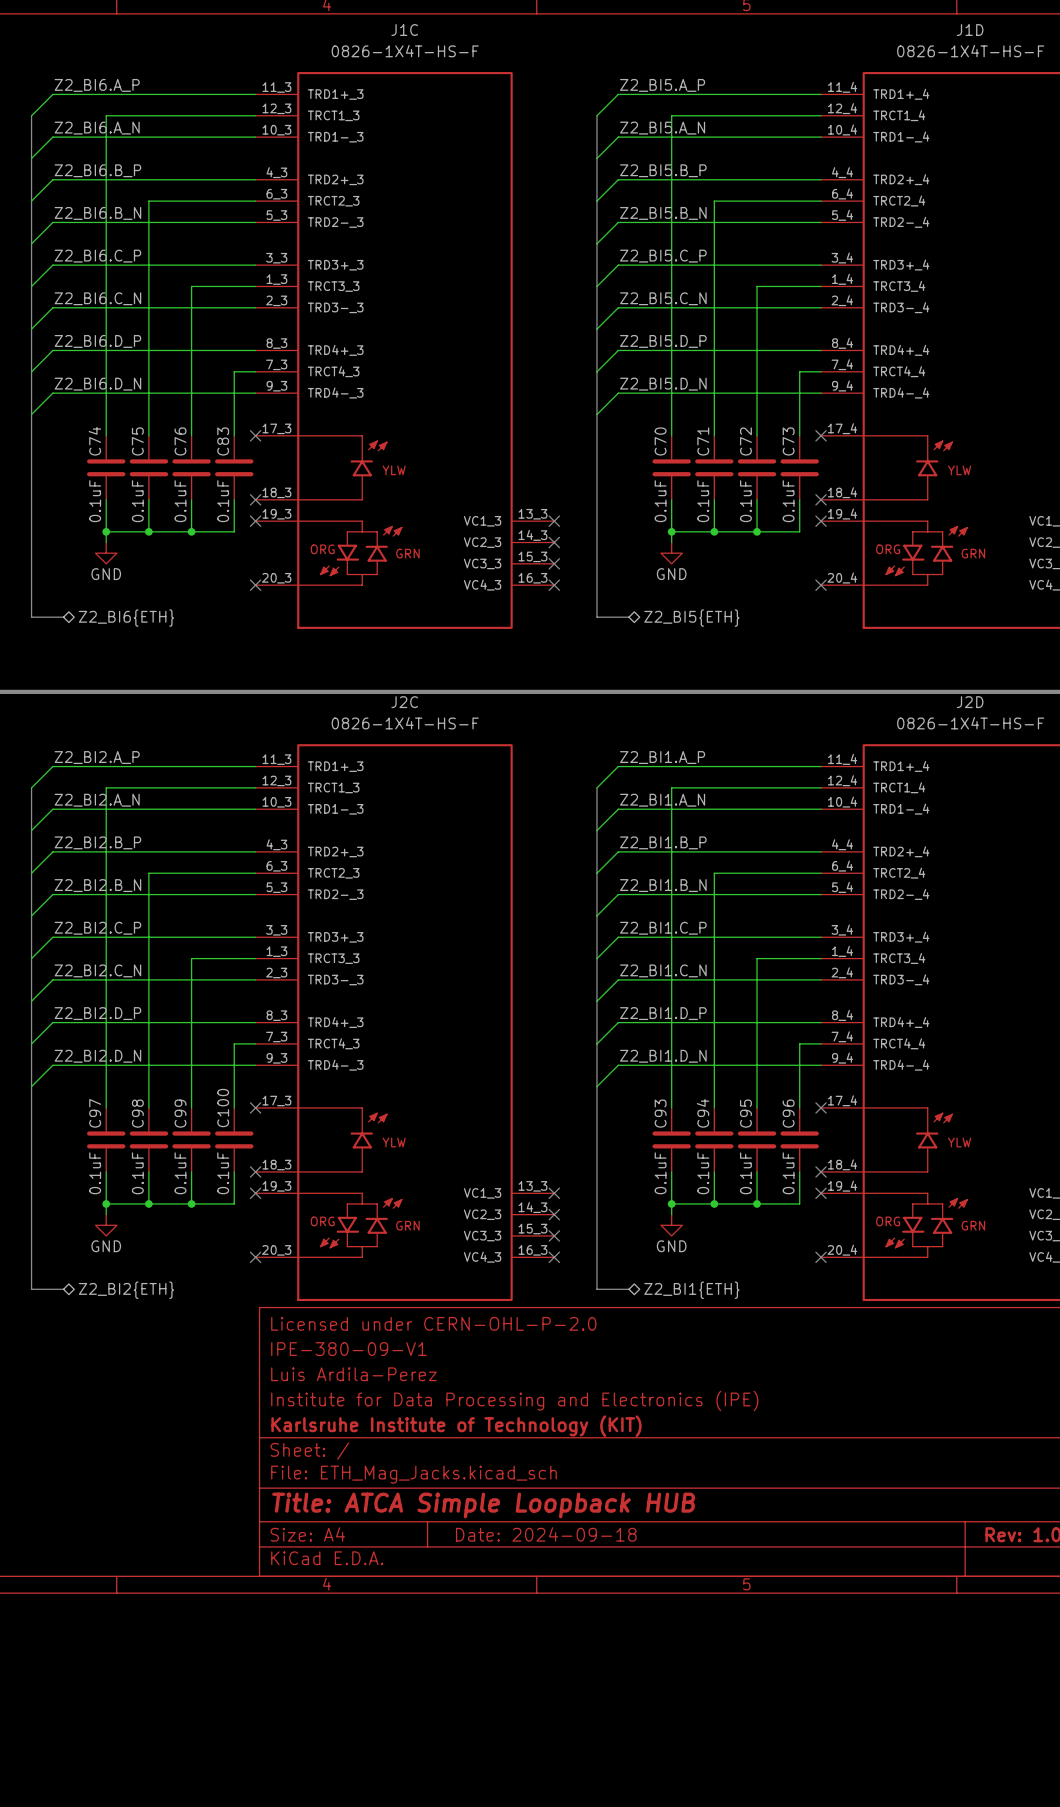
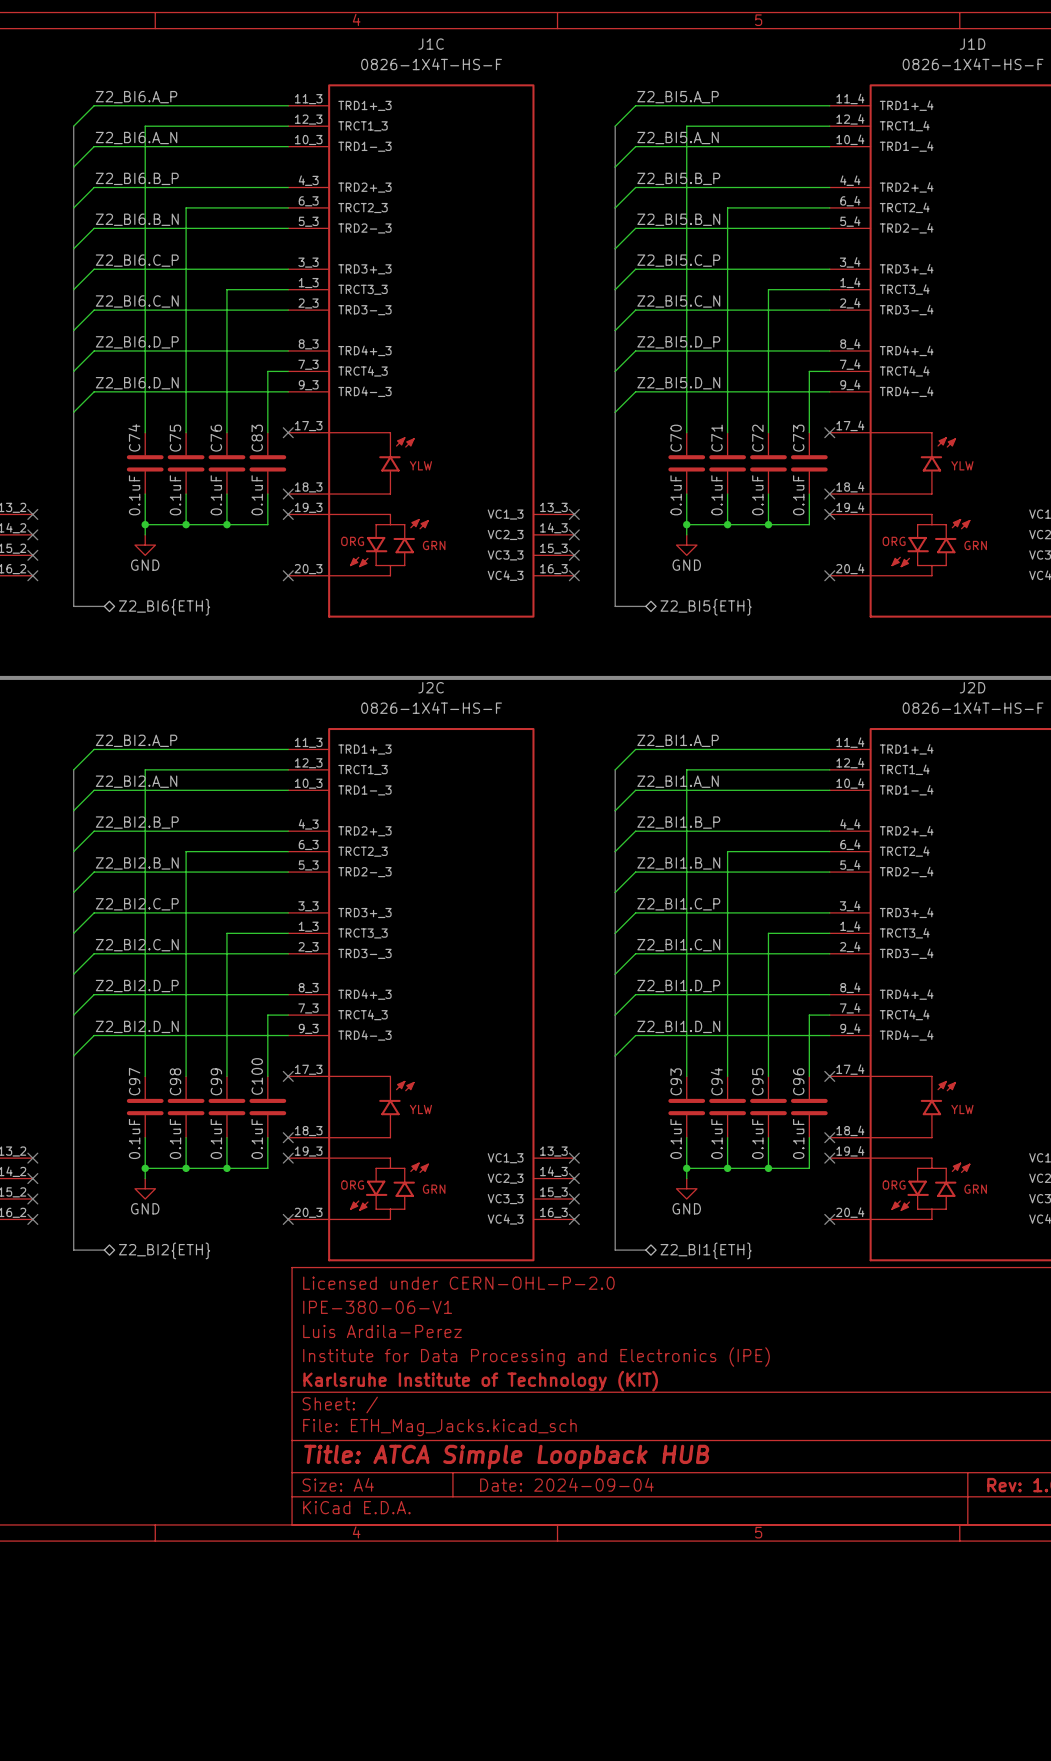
title block: IPE-380-09-V1 (348, 1349) -> IPE-380-06-V1 (377, 1307)
title block: Date: 2024-09-18 (546, 1534) -> Date: 2024-09-04 (566, 1484)

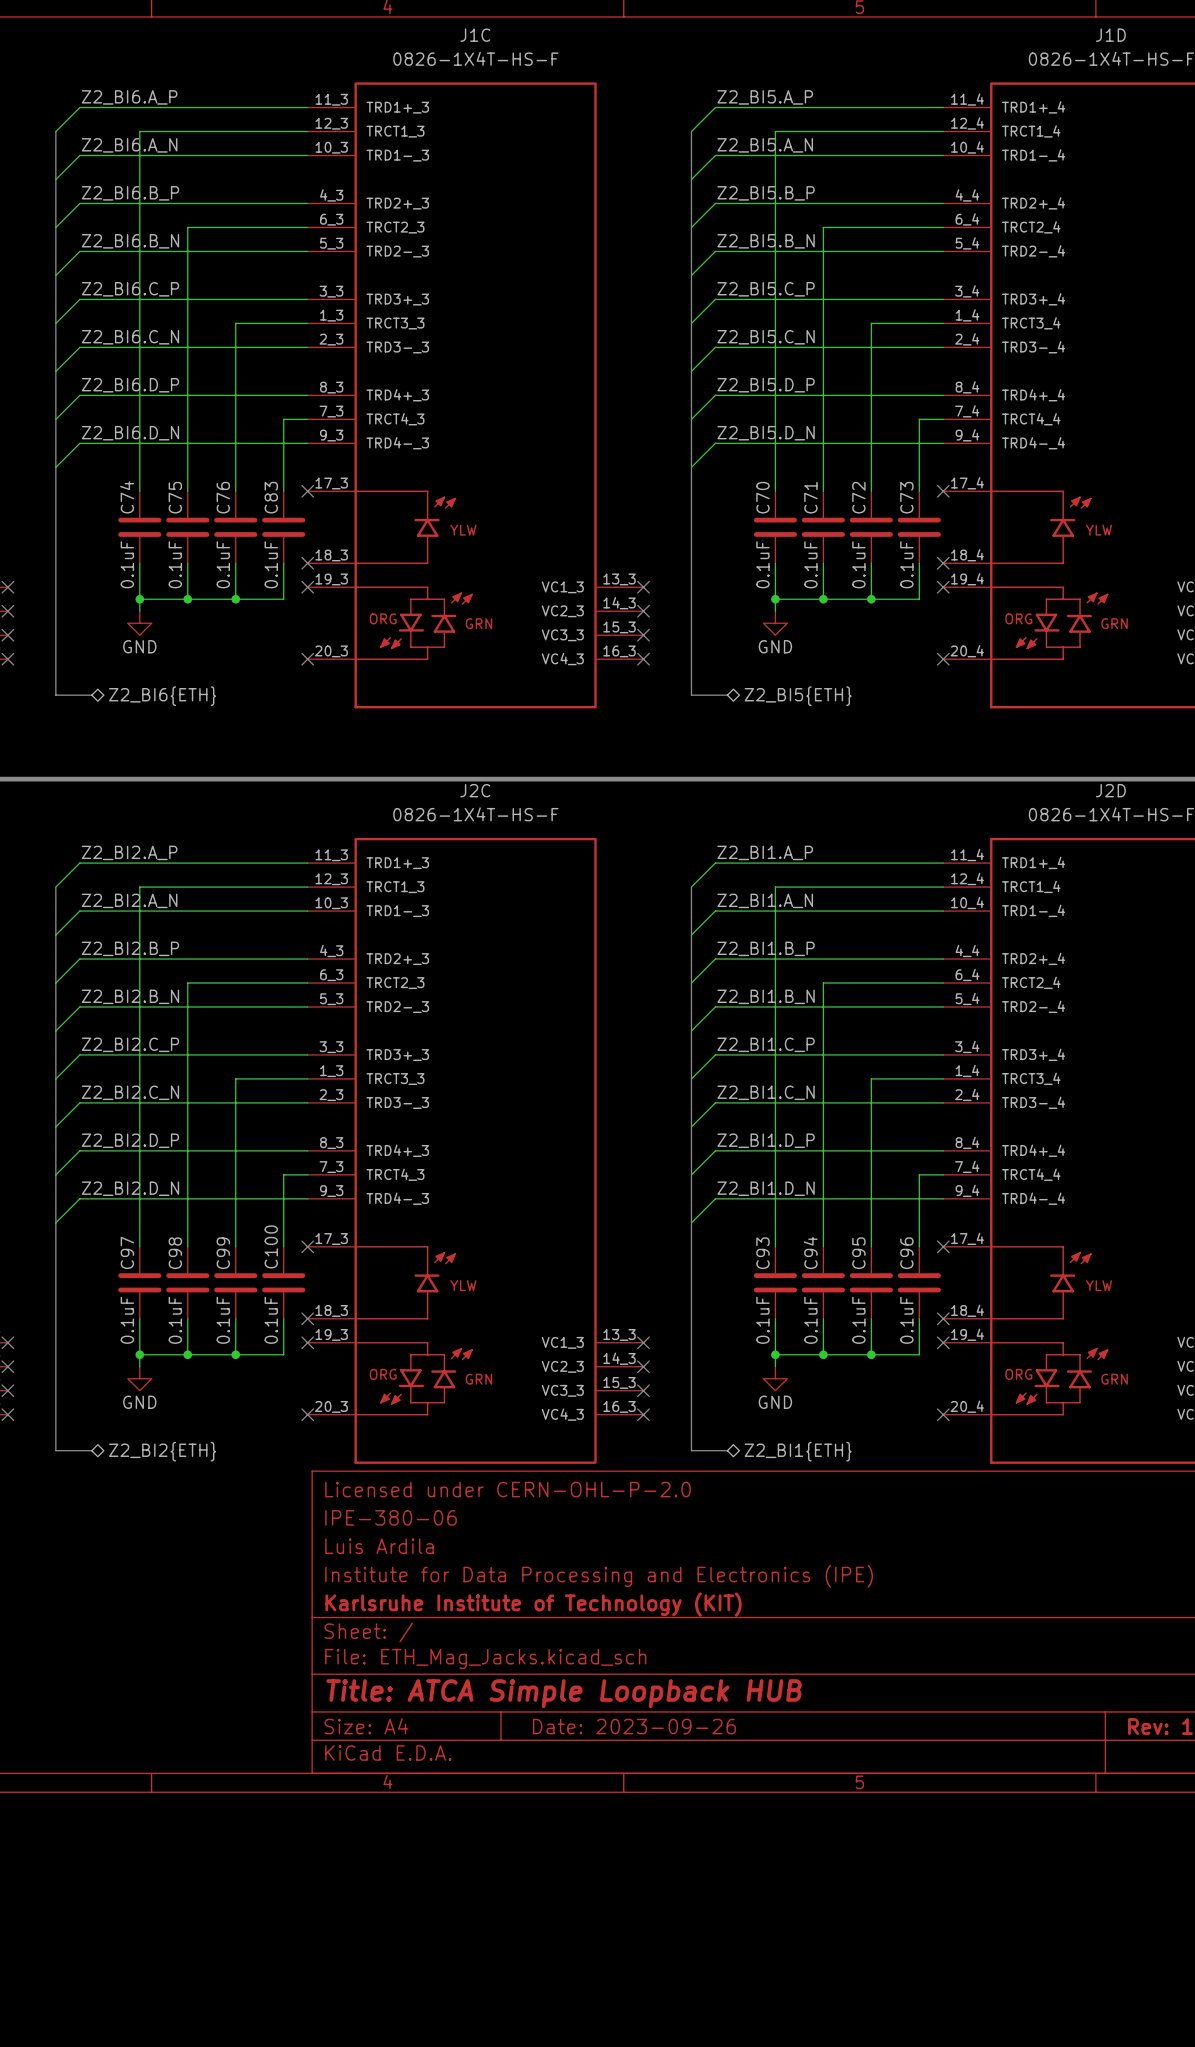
title block: IPE-380-06-V1 (377, 1307) -> IPE-380-06 (390, 1517)
title block: Luis Ardila-Perez (382, 1331) -> Luis Ardila (379, 1546)
title block: Date: 2024-09-04 (566, 1484) -> Date: 2023-09-26 (634, 1726)

